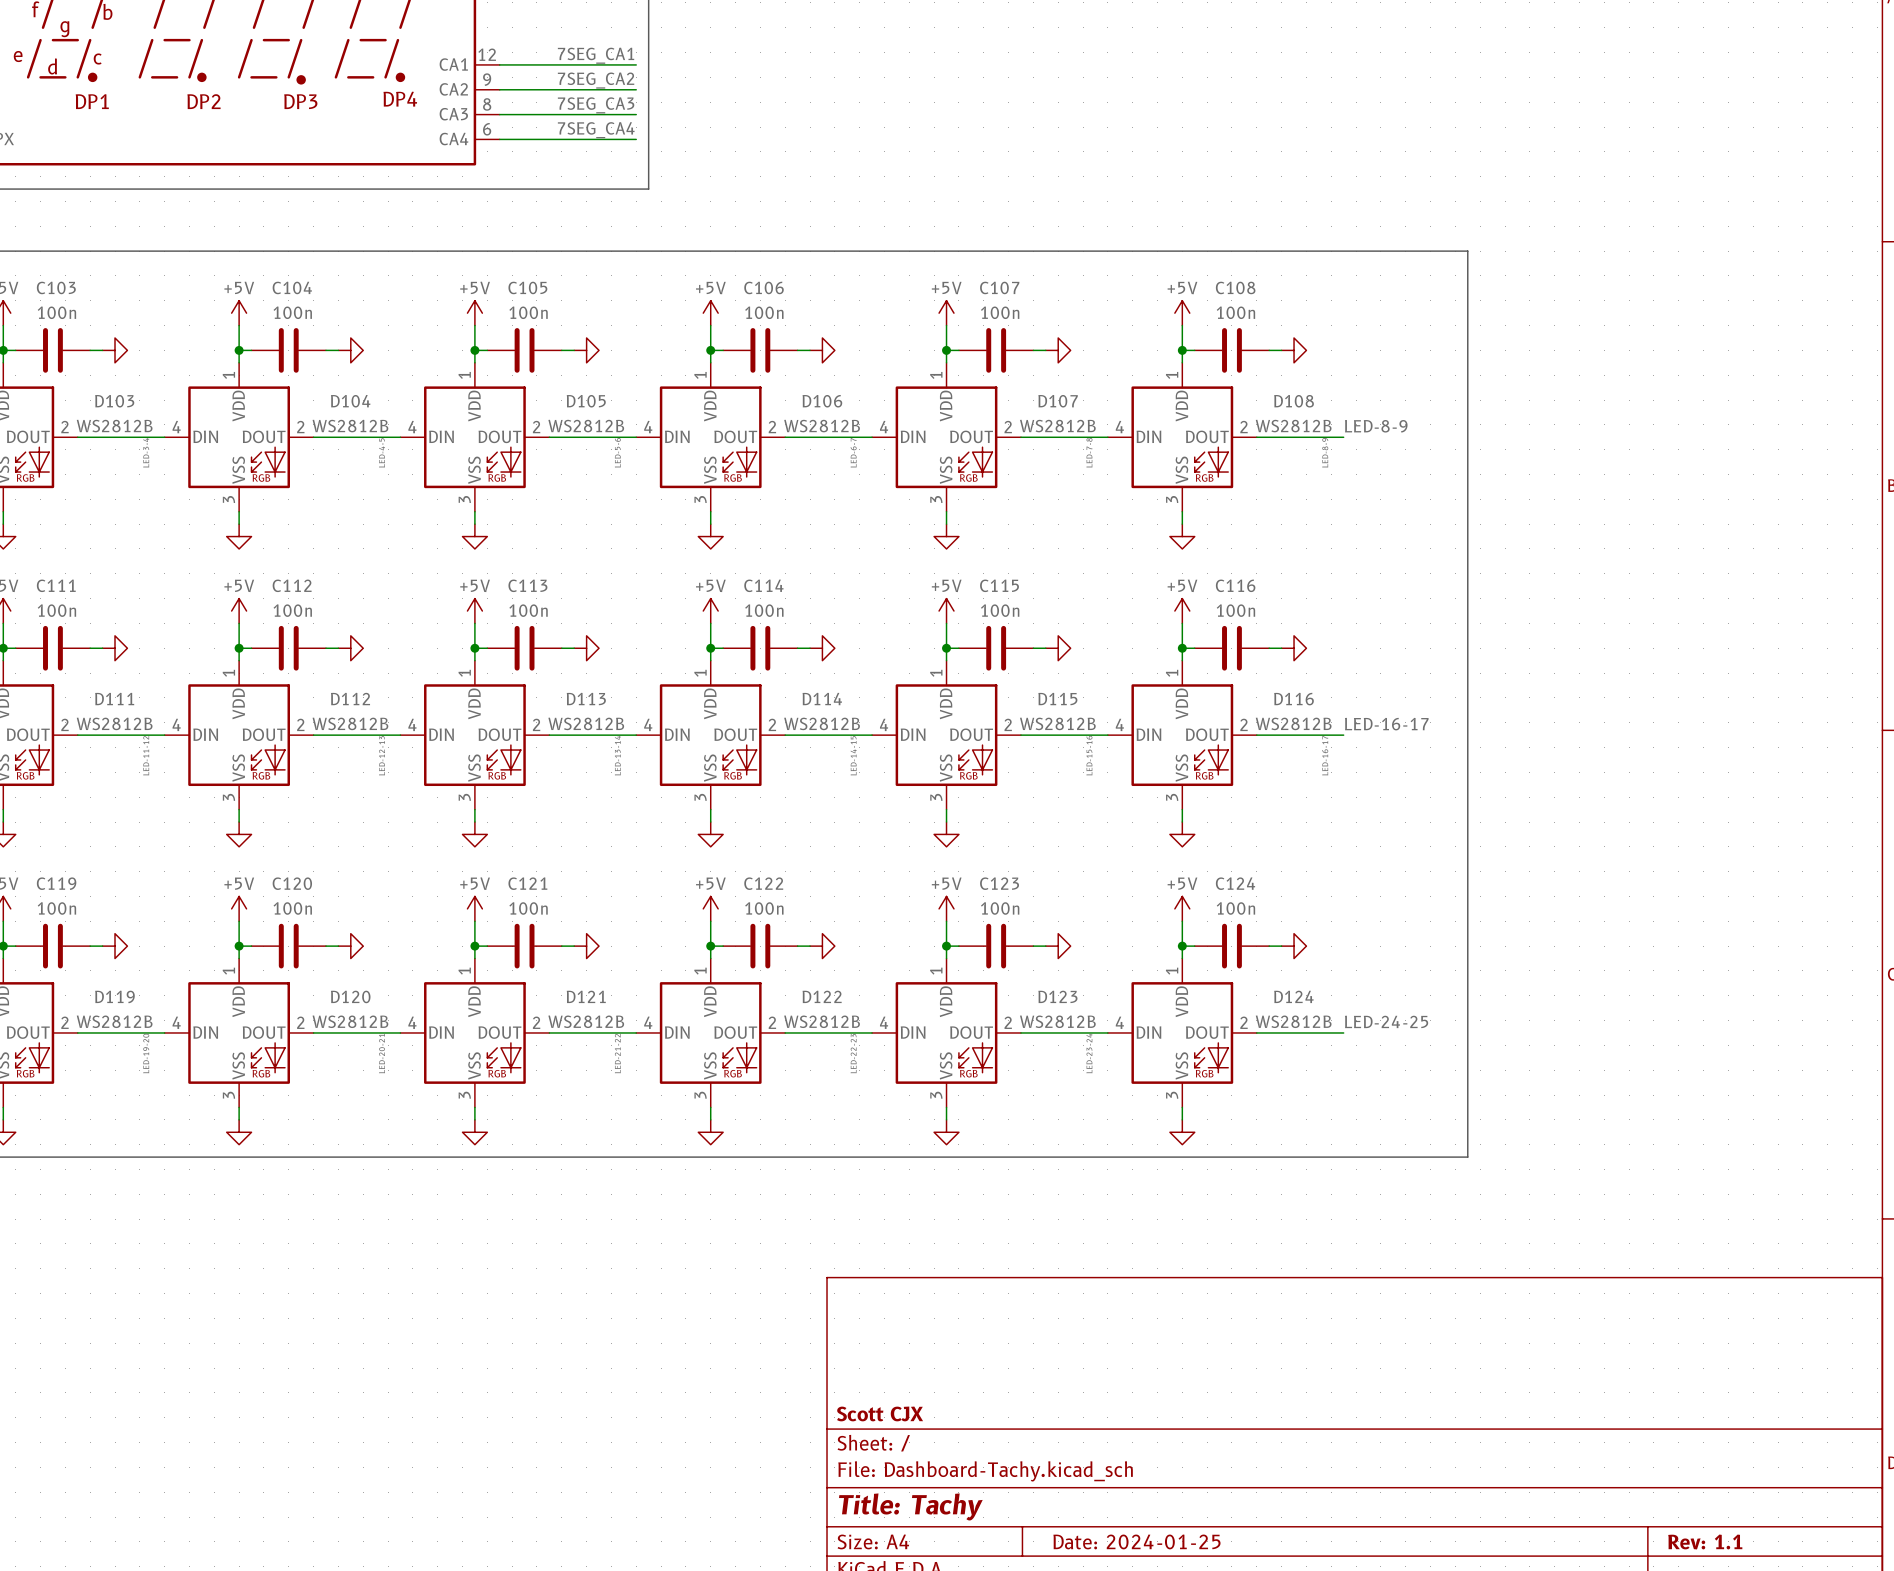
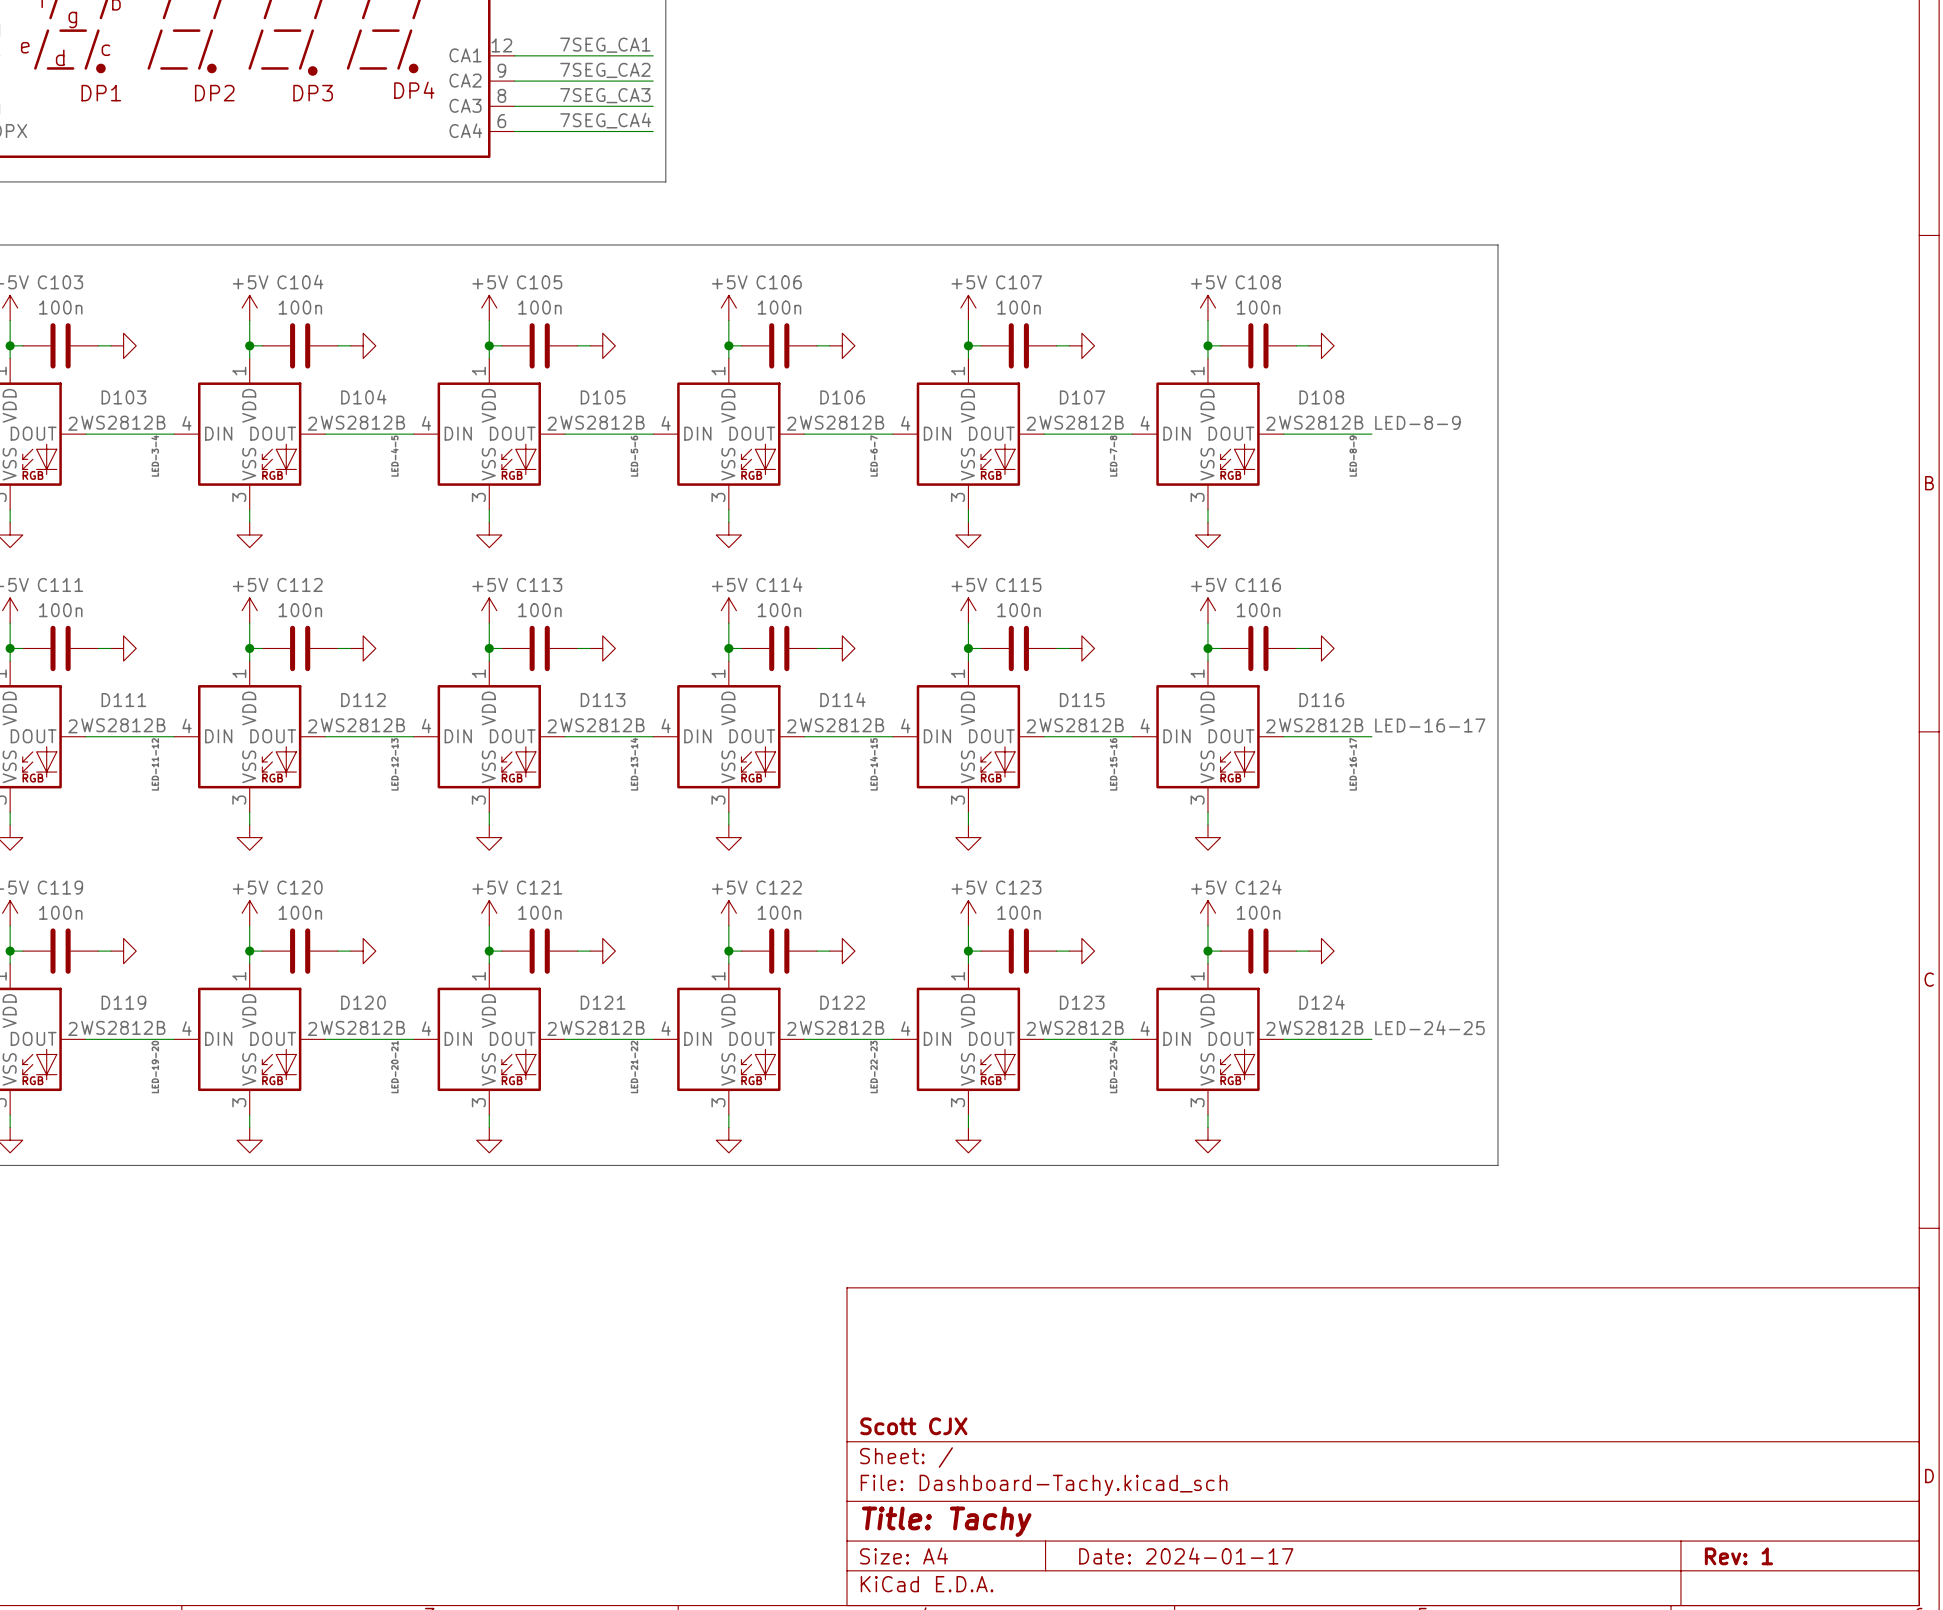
title block: Date: 2024-01-25 (1136, 1541) -> Date: 2024-01-17 (1186, 1556)
title block: Rev: 1.1 (1705, 1541) -> Rev: 1 (1738, 1556)

